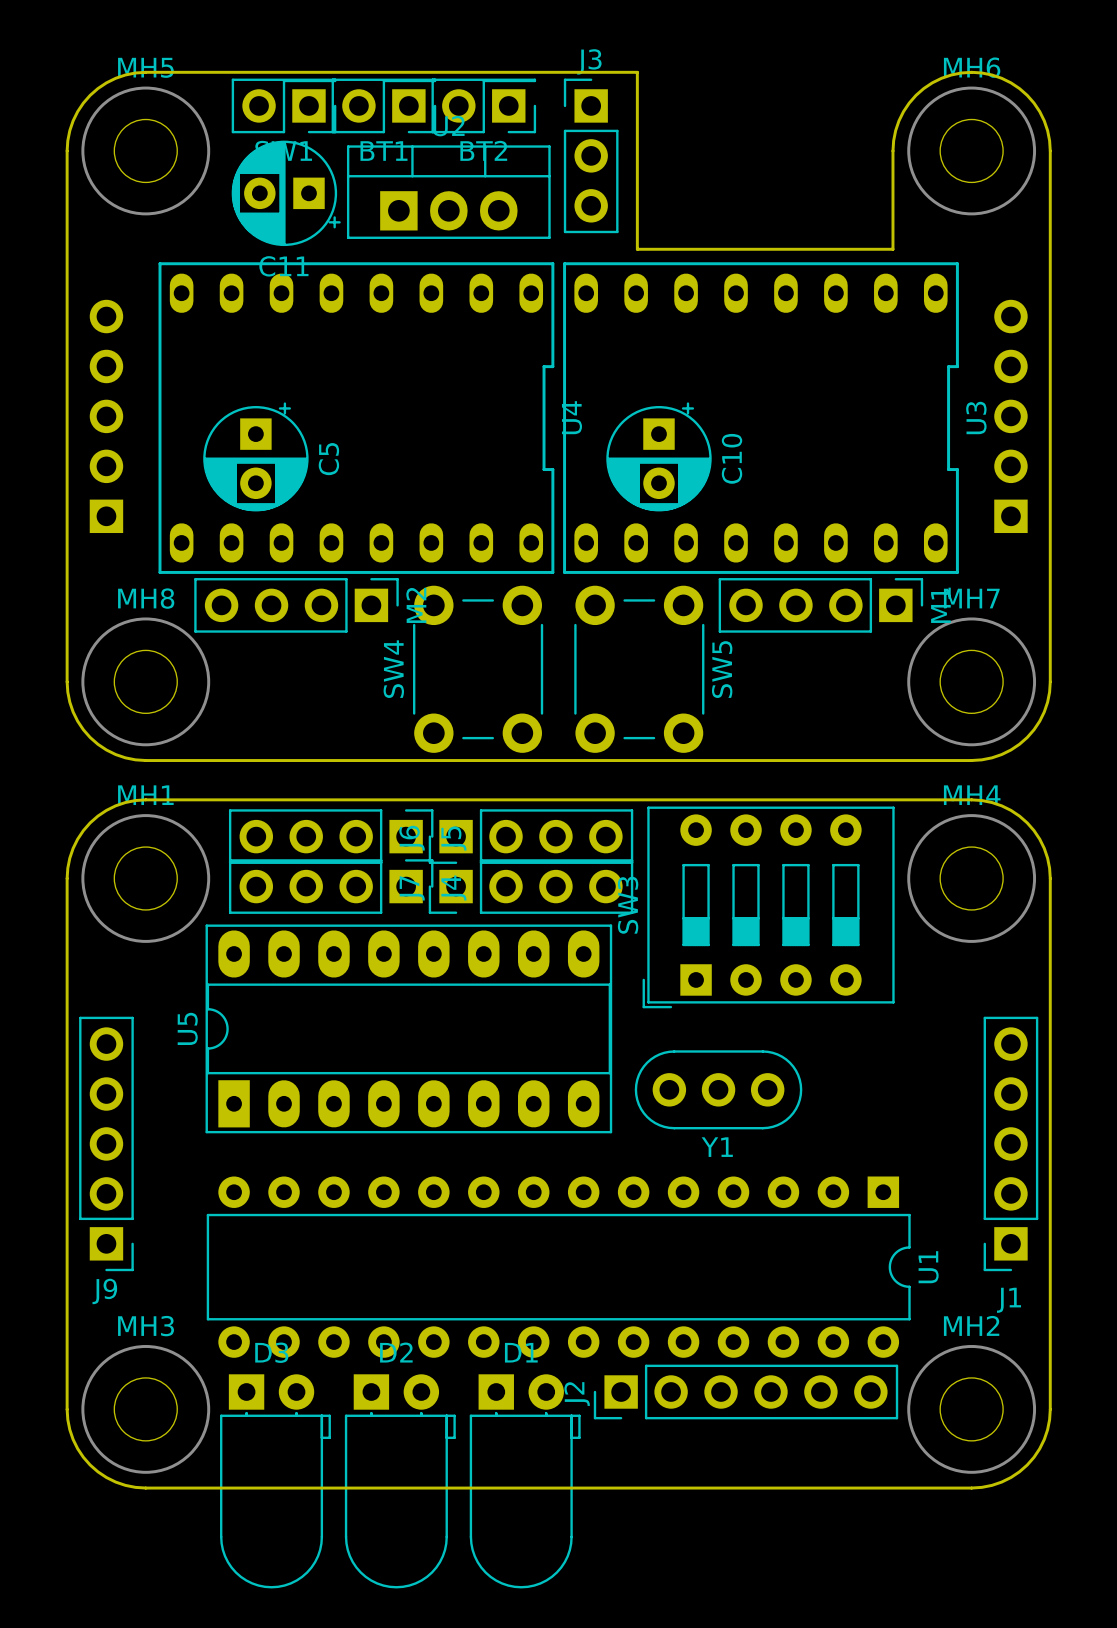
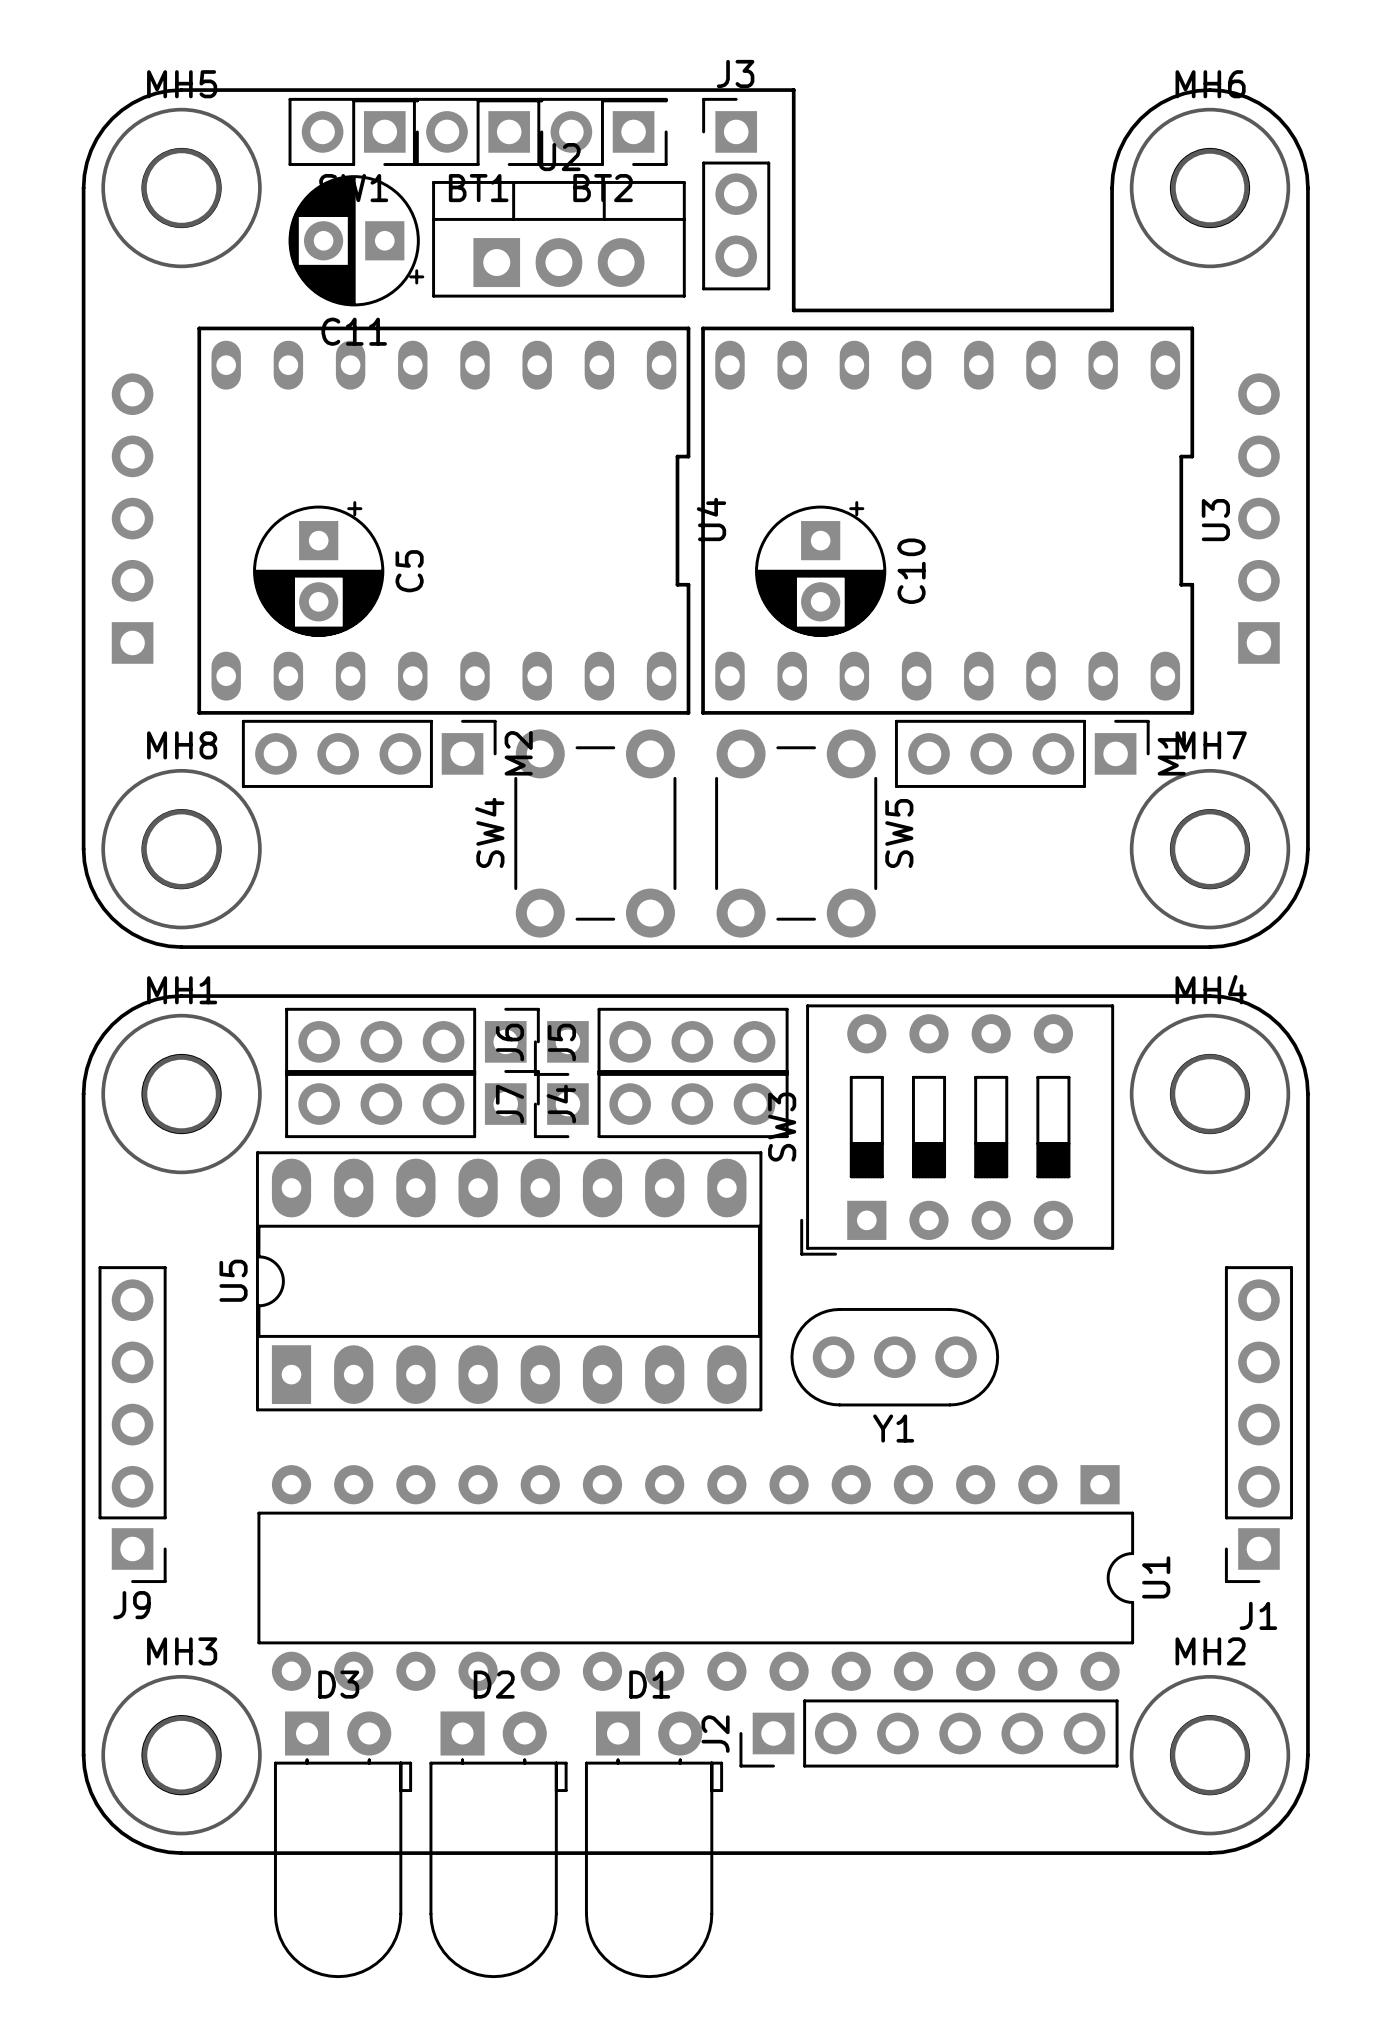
drawing: none -> [141, 148, 222, 228]
drawing: none -> [1170, 148, 1250, 228]
drawing: none -> [141, 809, 222, 889]
drawing: none -> [1170, 809, 1250, 889]
drawing: none -> [1170, 1054, 1250, 1134]
drawing: none -> [142, 1054, 221, 1134]
drawing: none -> [142, 1715, 221, 1795]
drawing: none -> [1170, 1715, 1250, 1795]

